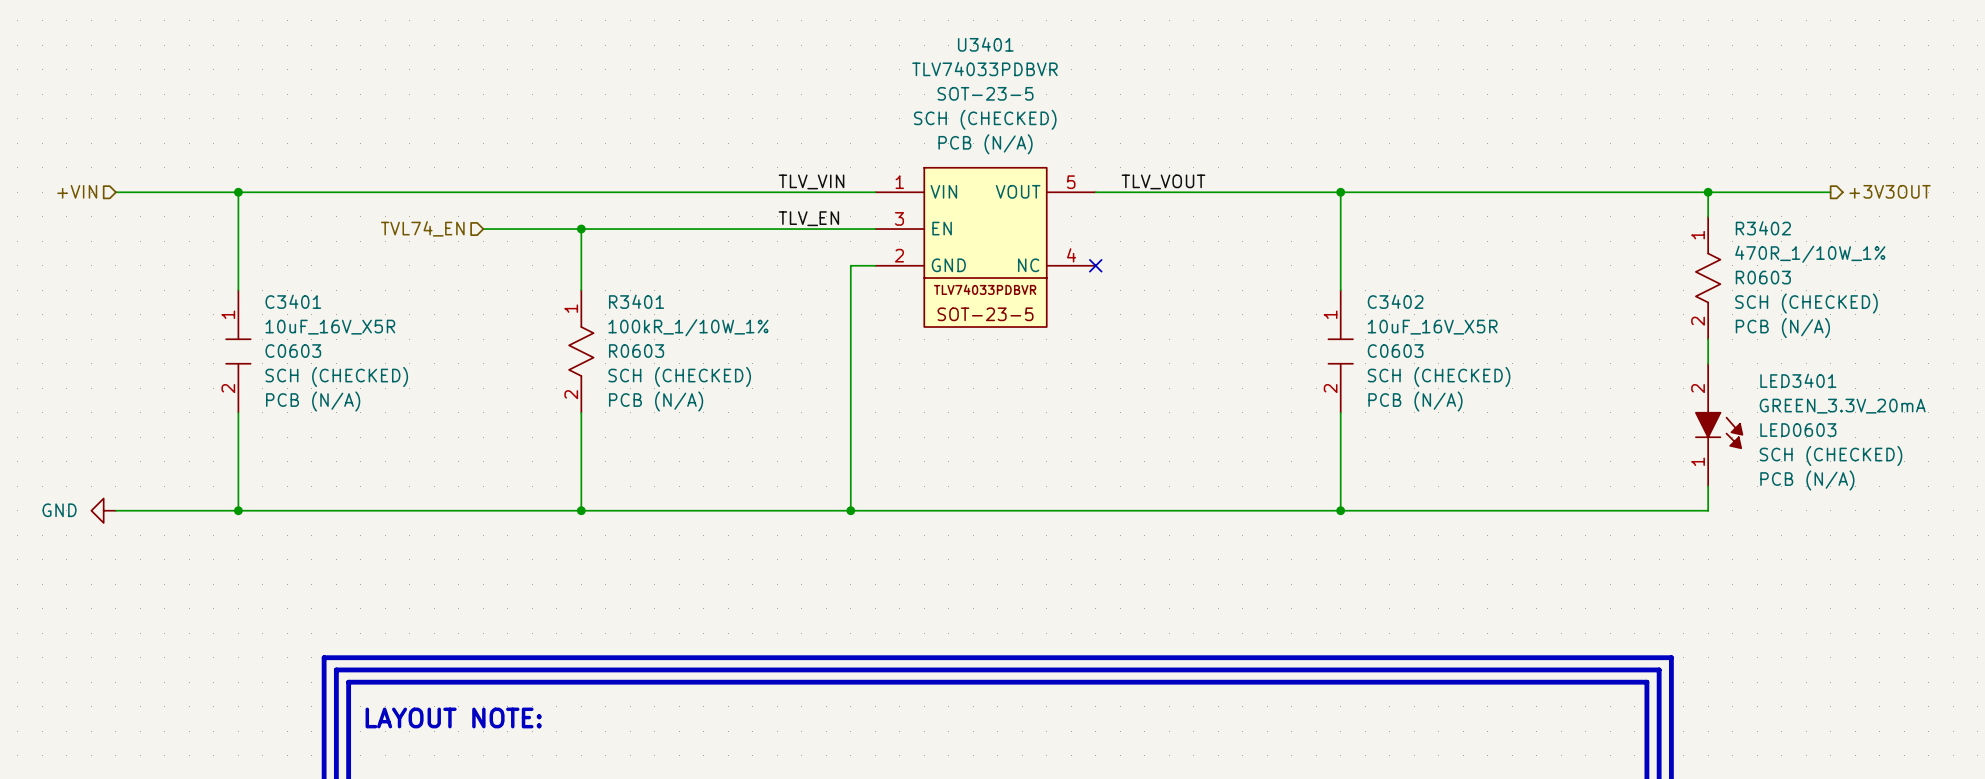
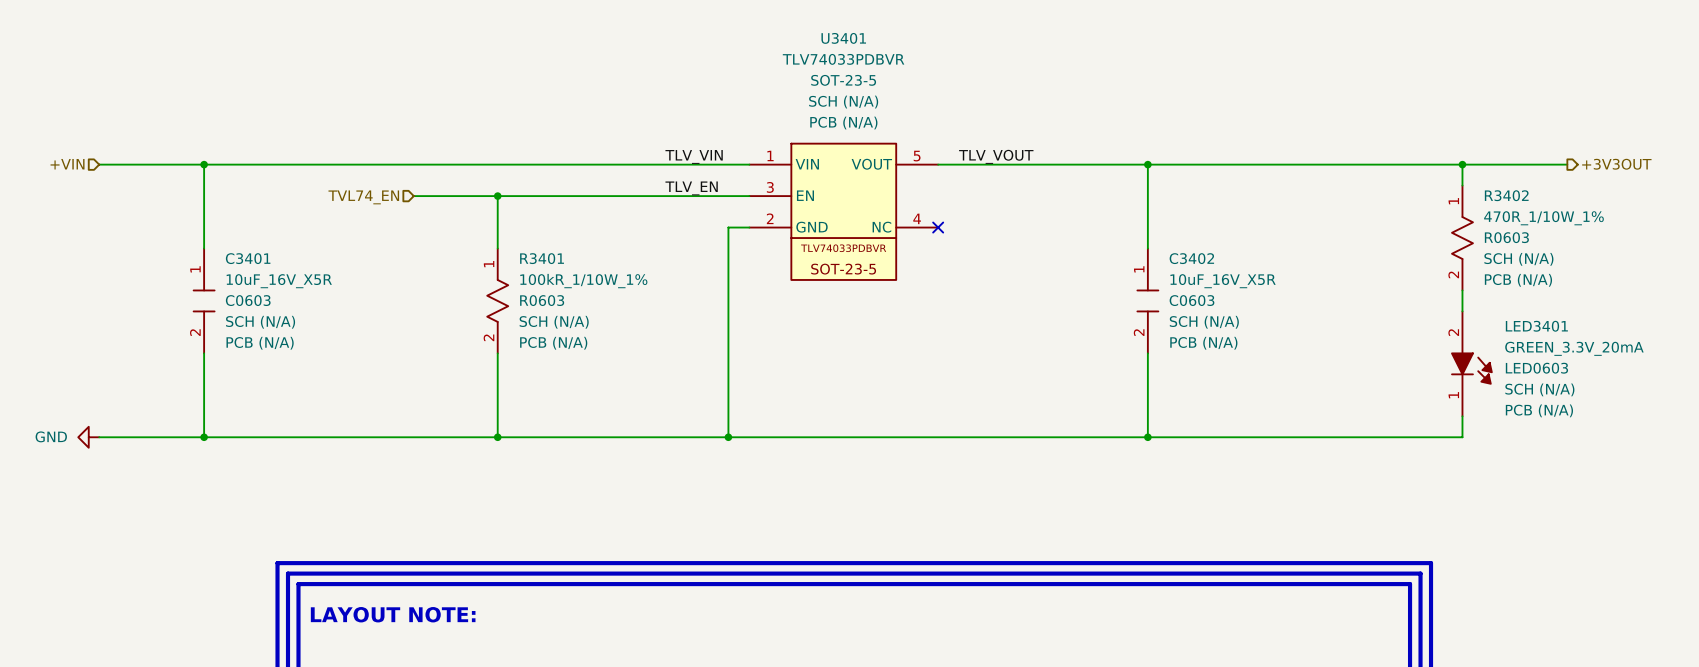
U3401 text: SCH (CHECKED) (985, 119) -> SCH (N/A) (843, 102)
R3402 text: SCH (CHECKED) (1806, 303) -> SCH (N/A) (1518, 259)
C3401 text: SCH (CHECKED) (336, 377) -> SCH (N/A) (260, 322)
R3401 text: SCH (CHECKED) (679, 377) -> SCH (N/A) (554, 322)
C3402 text: SCH (CHECKED) (1439, 377) -> SCH (N/A) (1204, 322)
LED3401 text: SCH (CHECKED) (1831, 455) -> SCH (N/A) (1539, 389)

